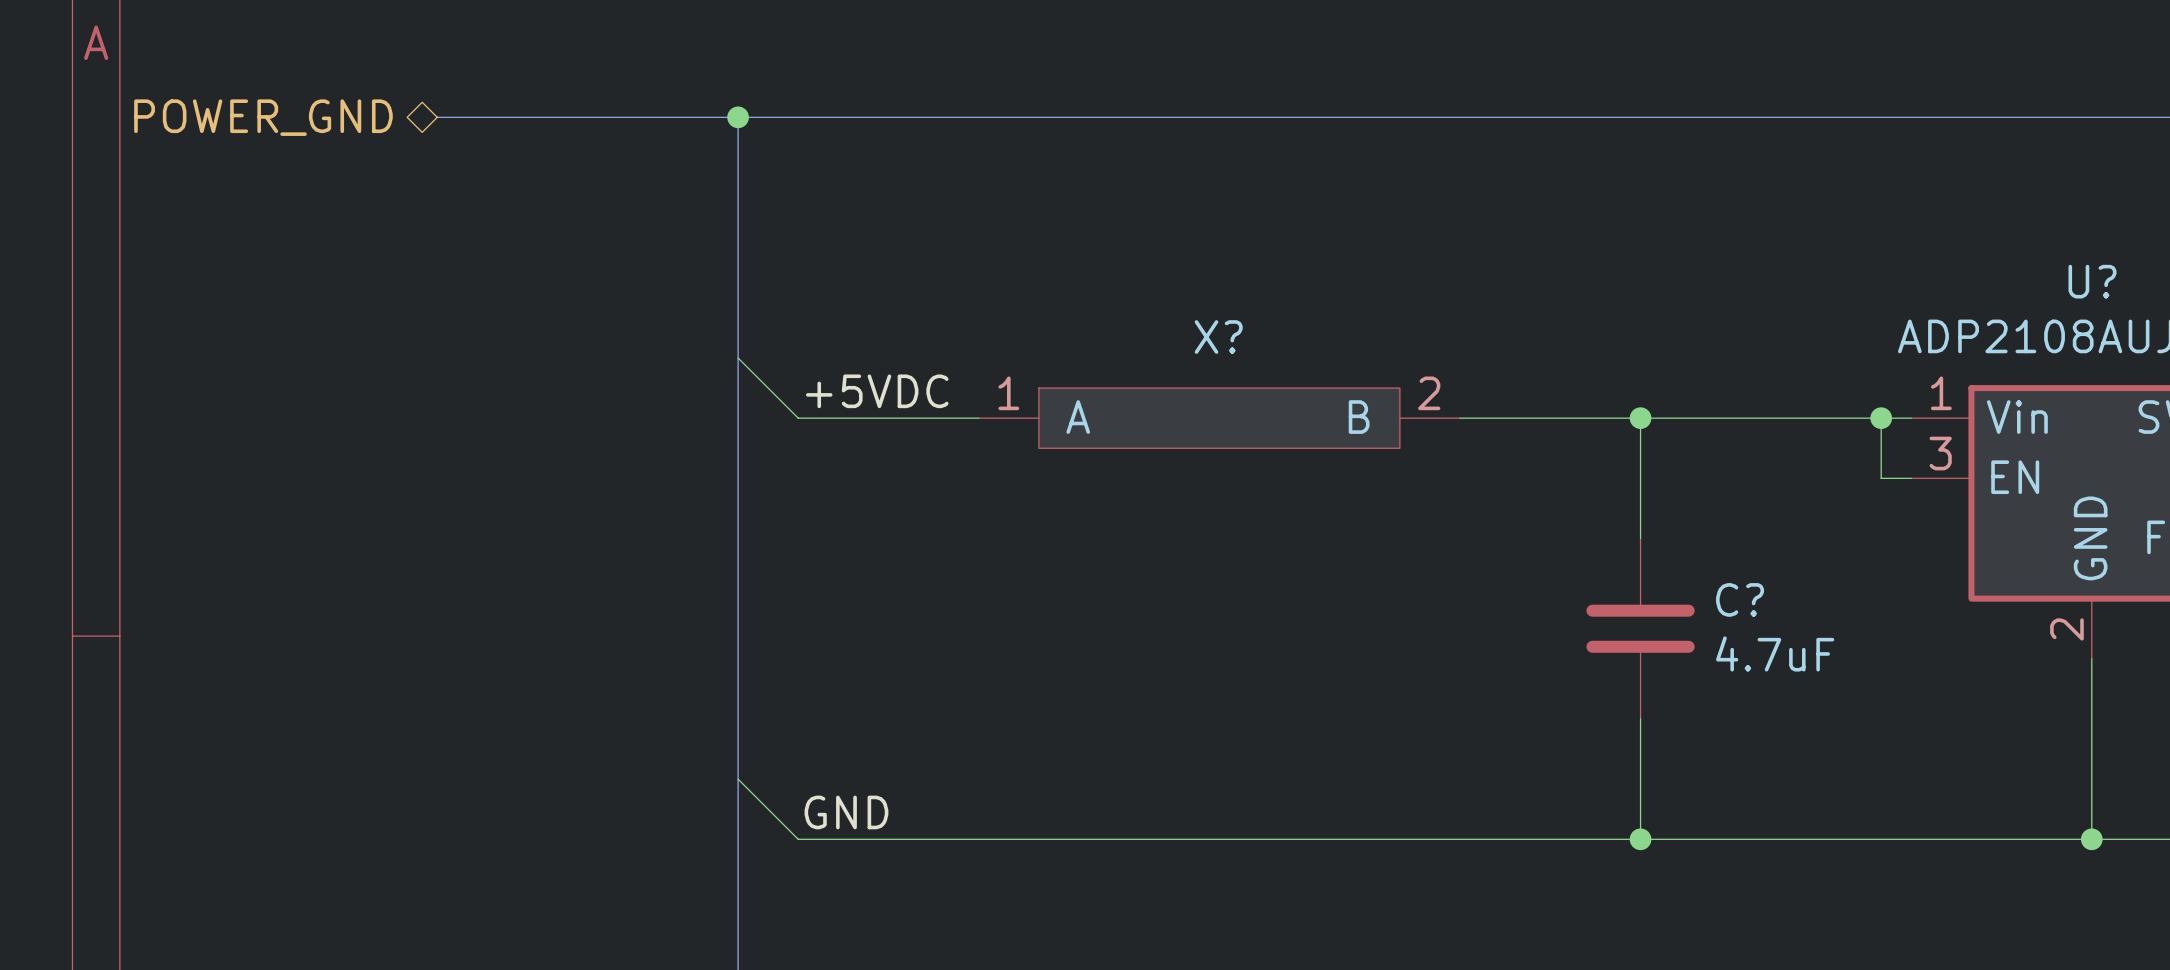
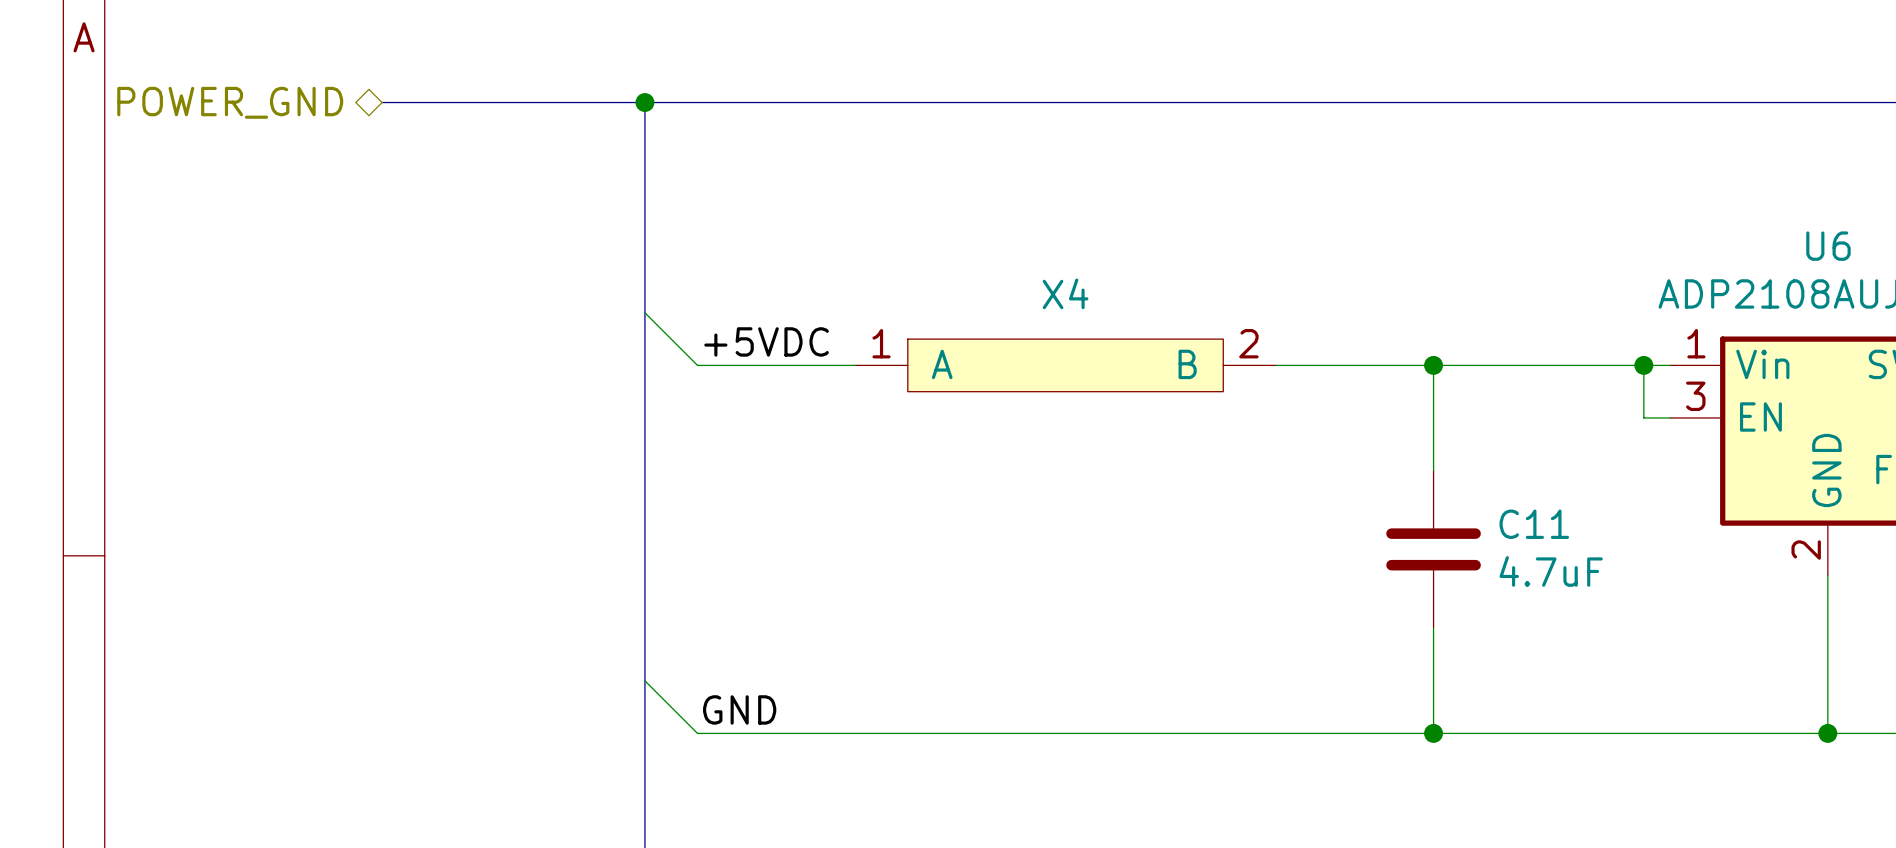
U? name: U? (2092, 281) -> U6 (1828, 246)
X? name: X? (1218, 337) -> X4 (1065, 293)
C? name: C? (1740, 599) -> C11 (1534, 524)

